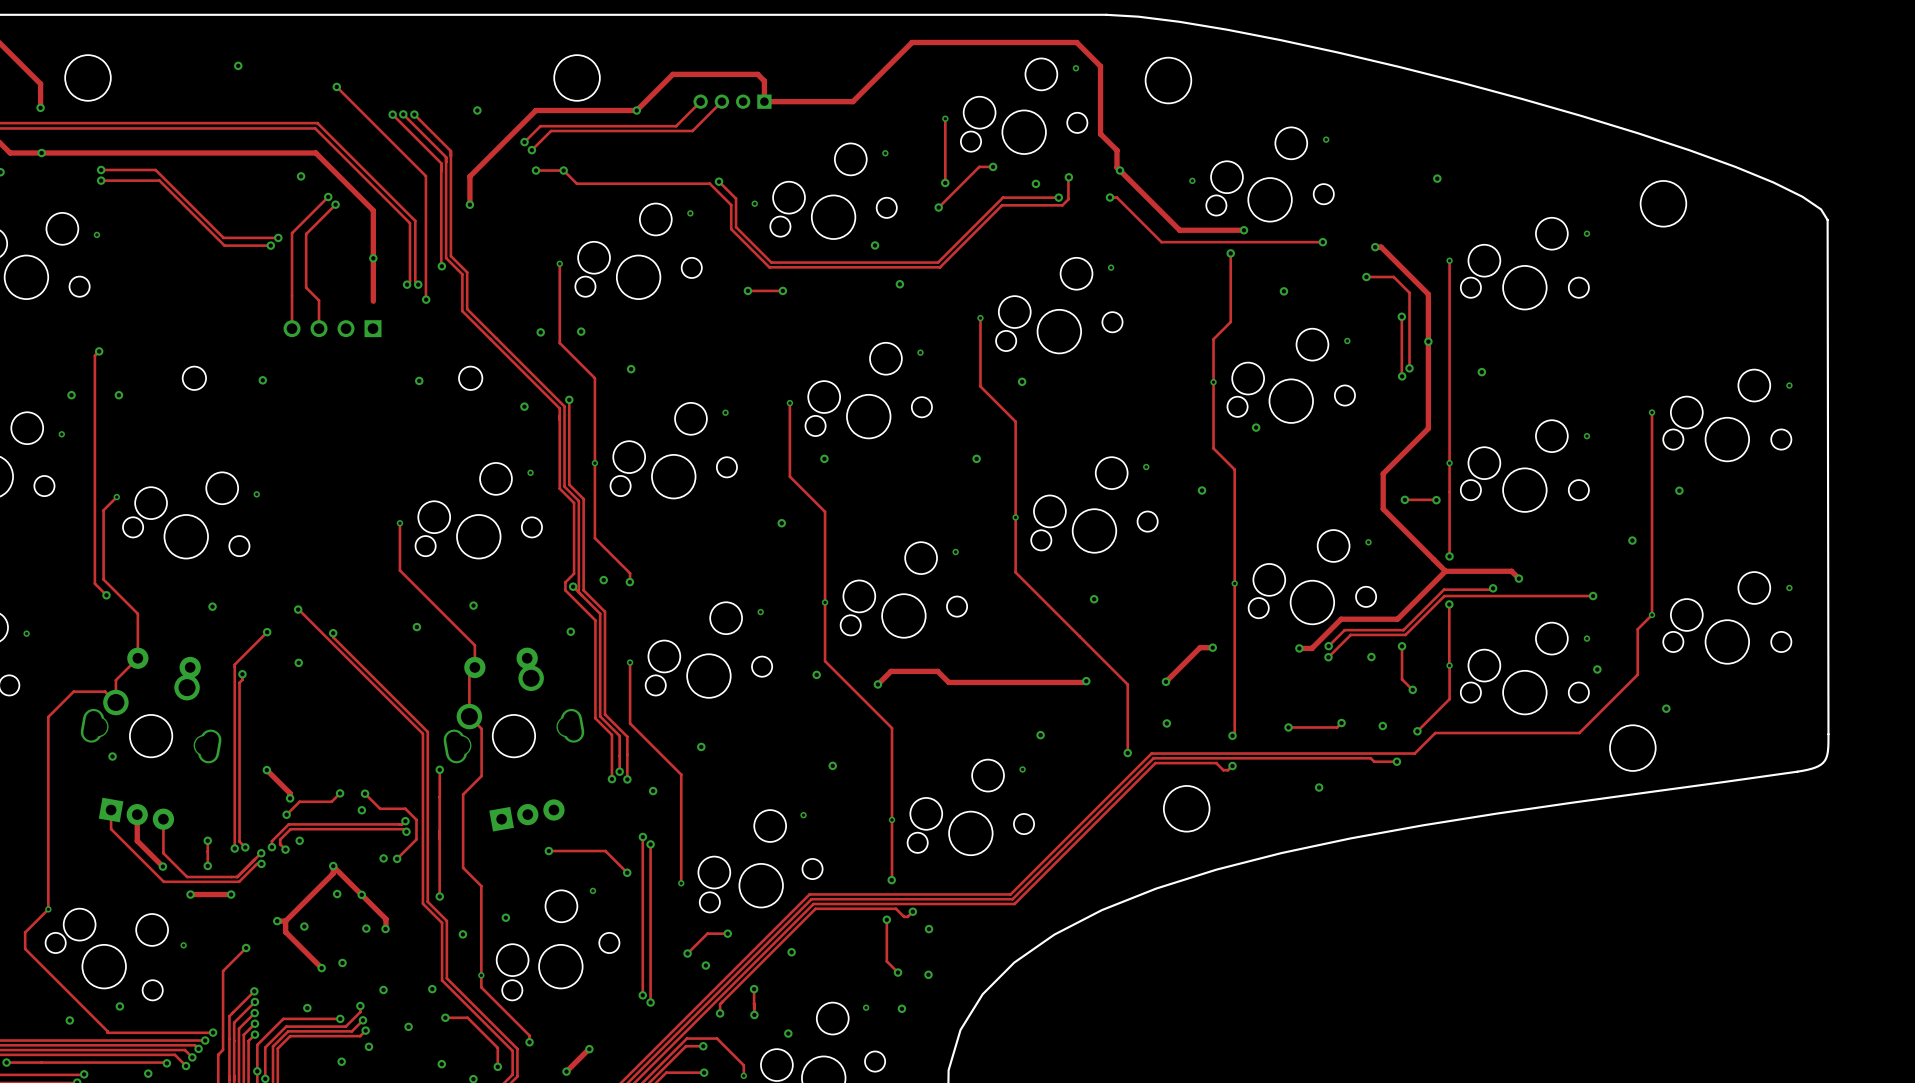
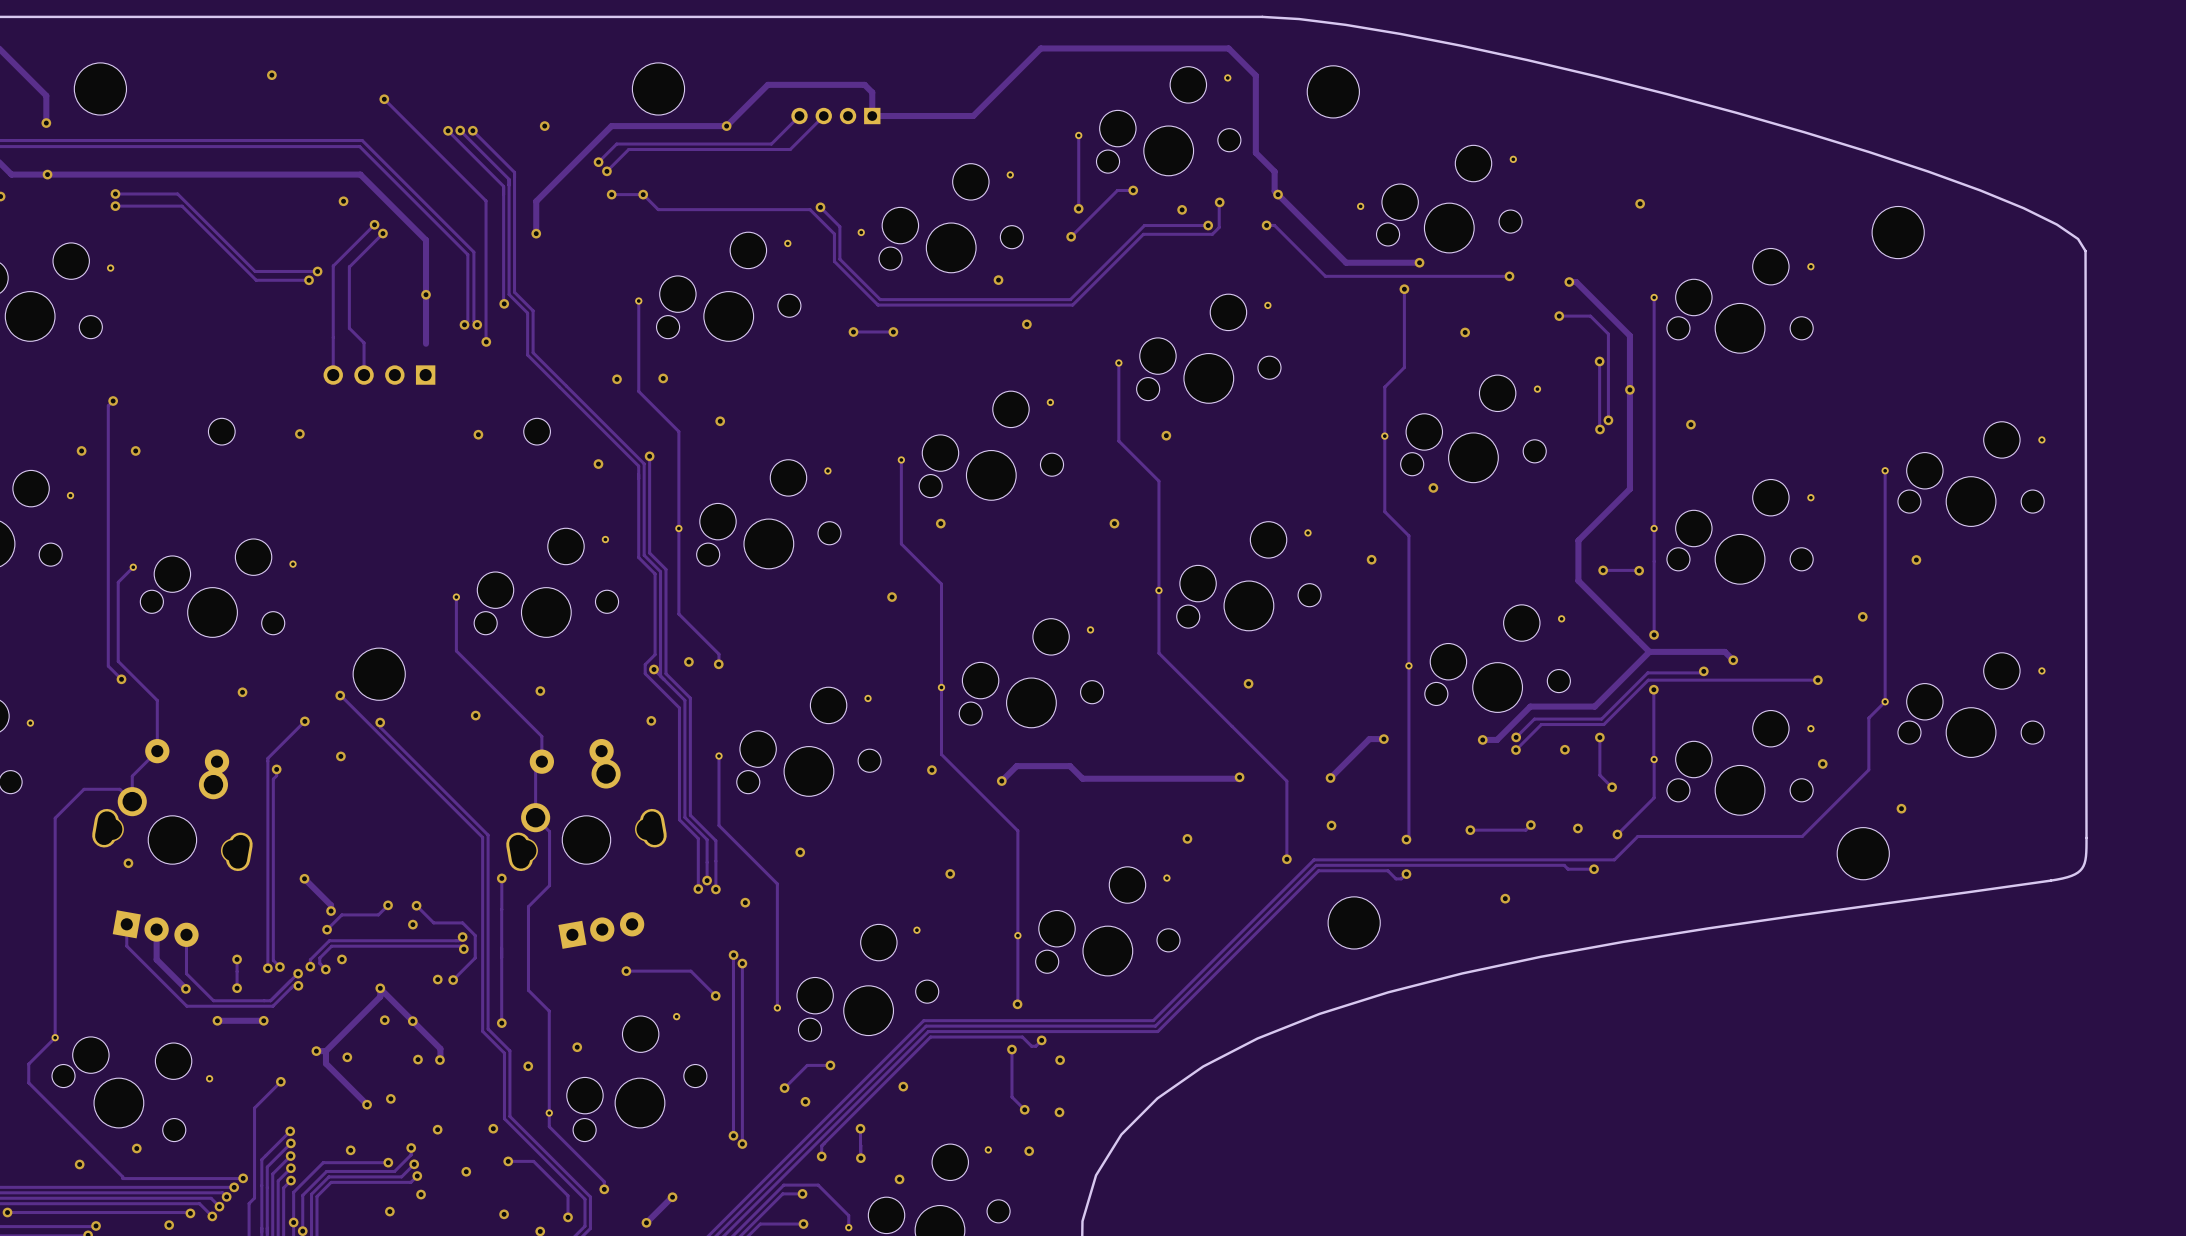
part: none -> (379, 674)

